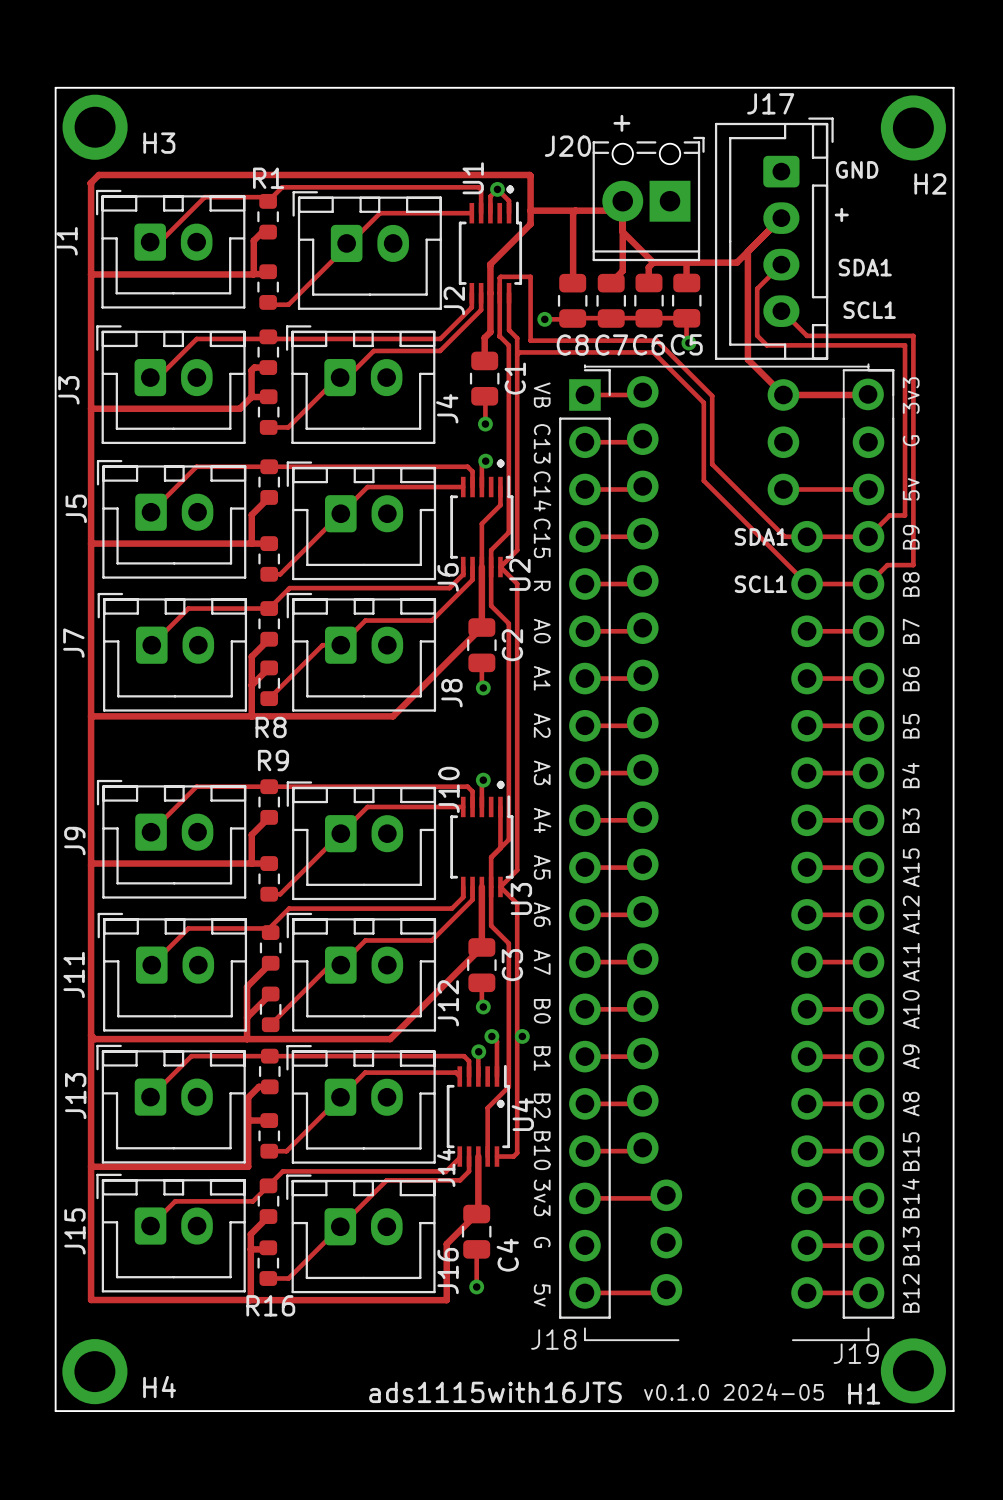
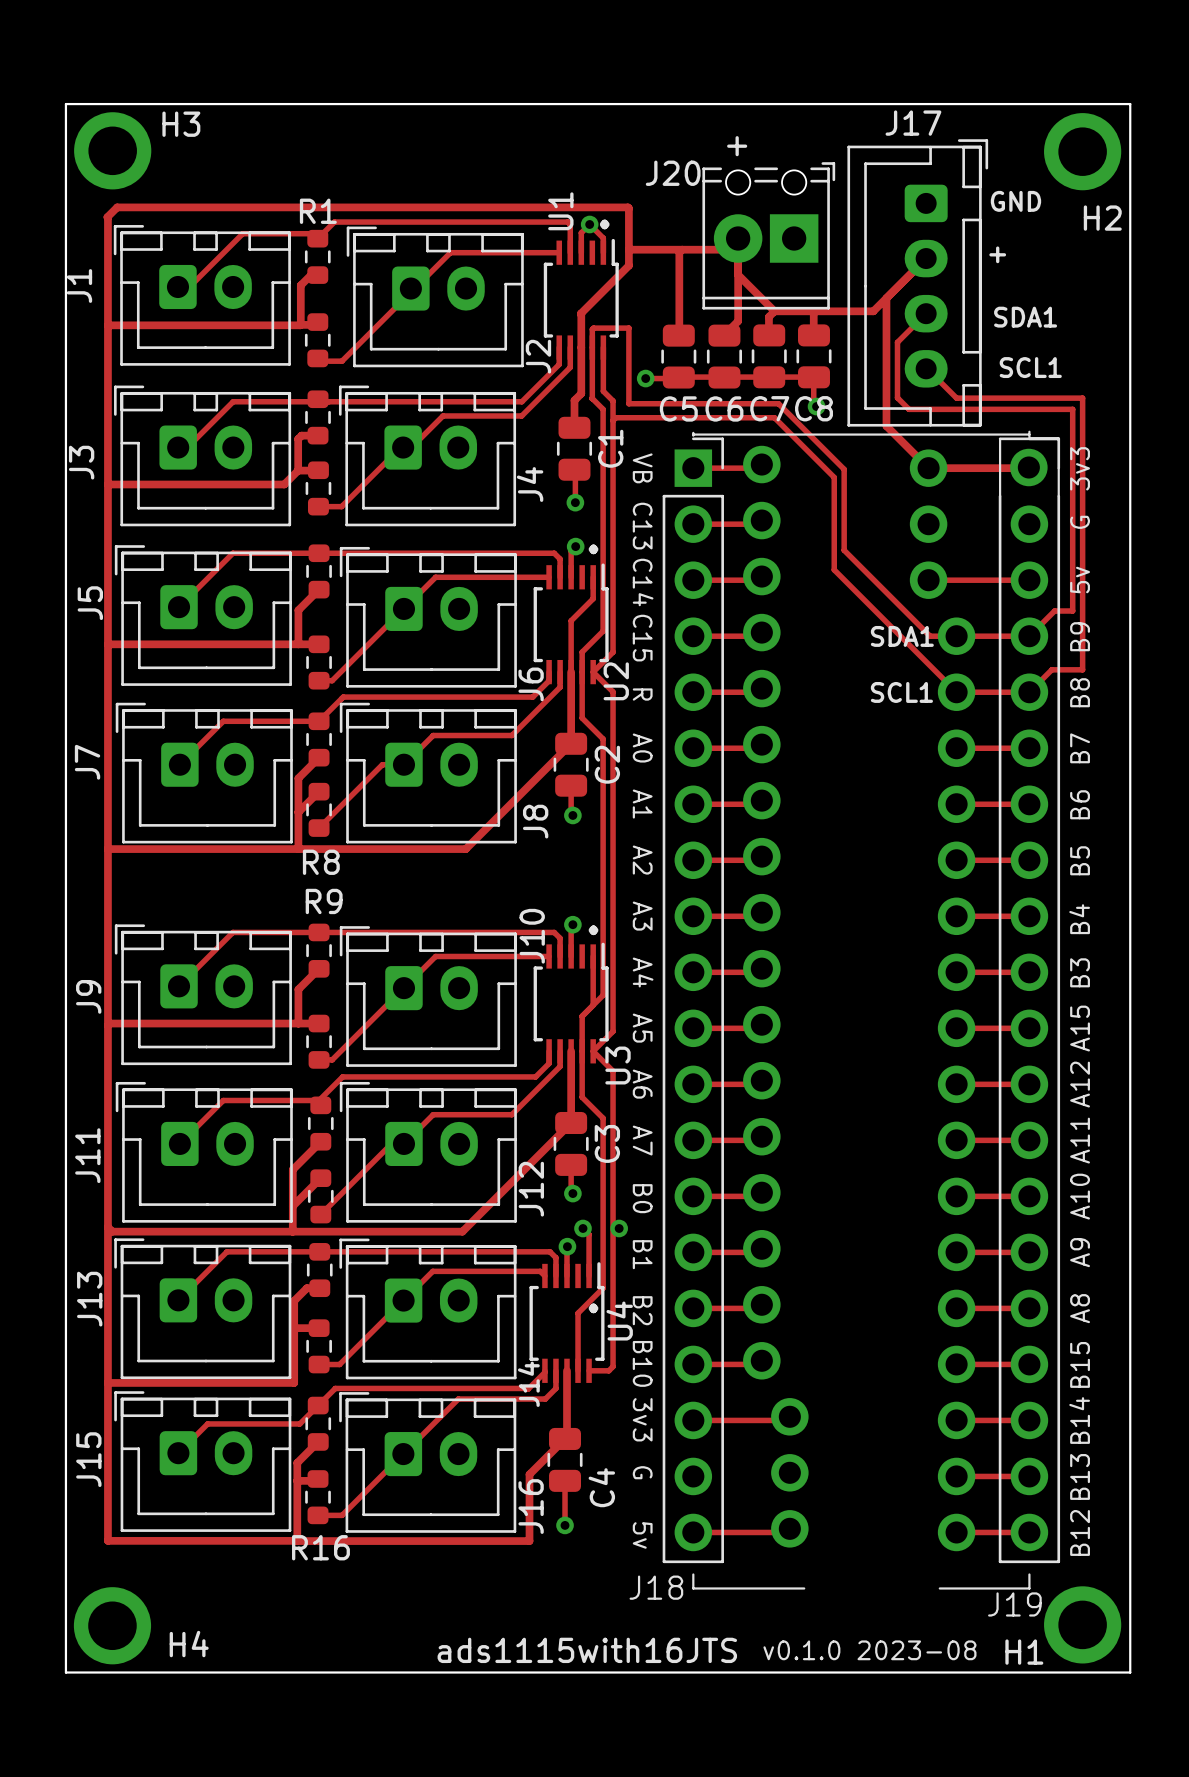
H3 name position: H3 (159, 143) -> H3 (181, 124)
C6 name: C6 (648, 344) -> C7 (769, 408)
C5 name: C5 (686, 344) -> C8 (814, 408)
C8 name: C8 (572, 345) -> C5 (678, 408)
C7 name: C7 (611, 345) -> C6 (724, 408)
text: v0.1.0 2024-05 (733, 1392) -> v0.1.0 2023-08 (869, 1650)

